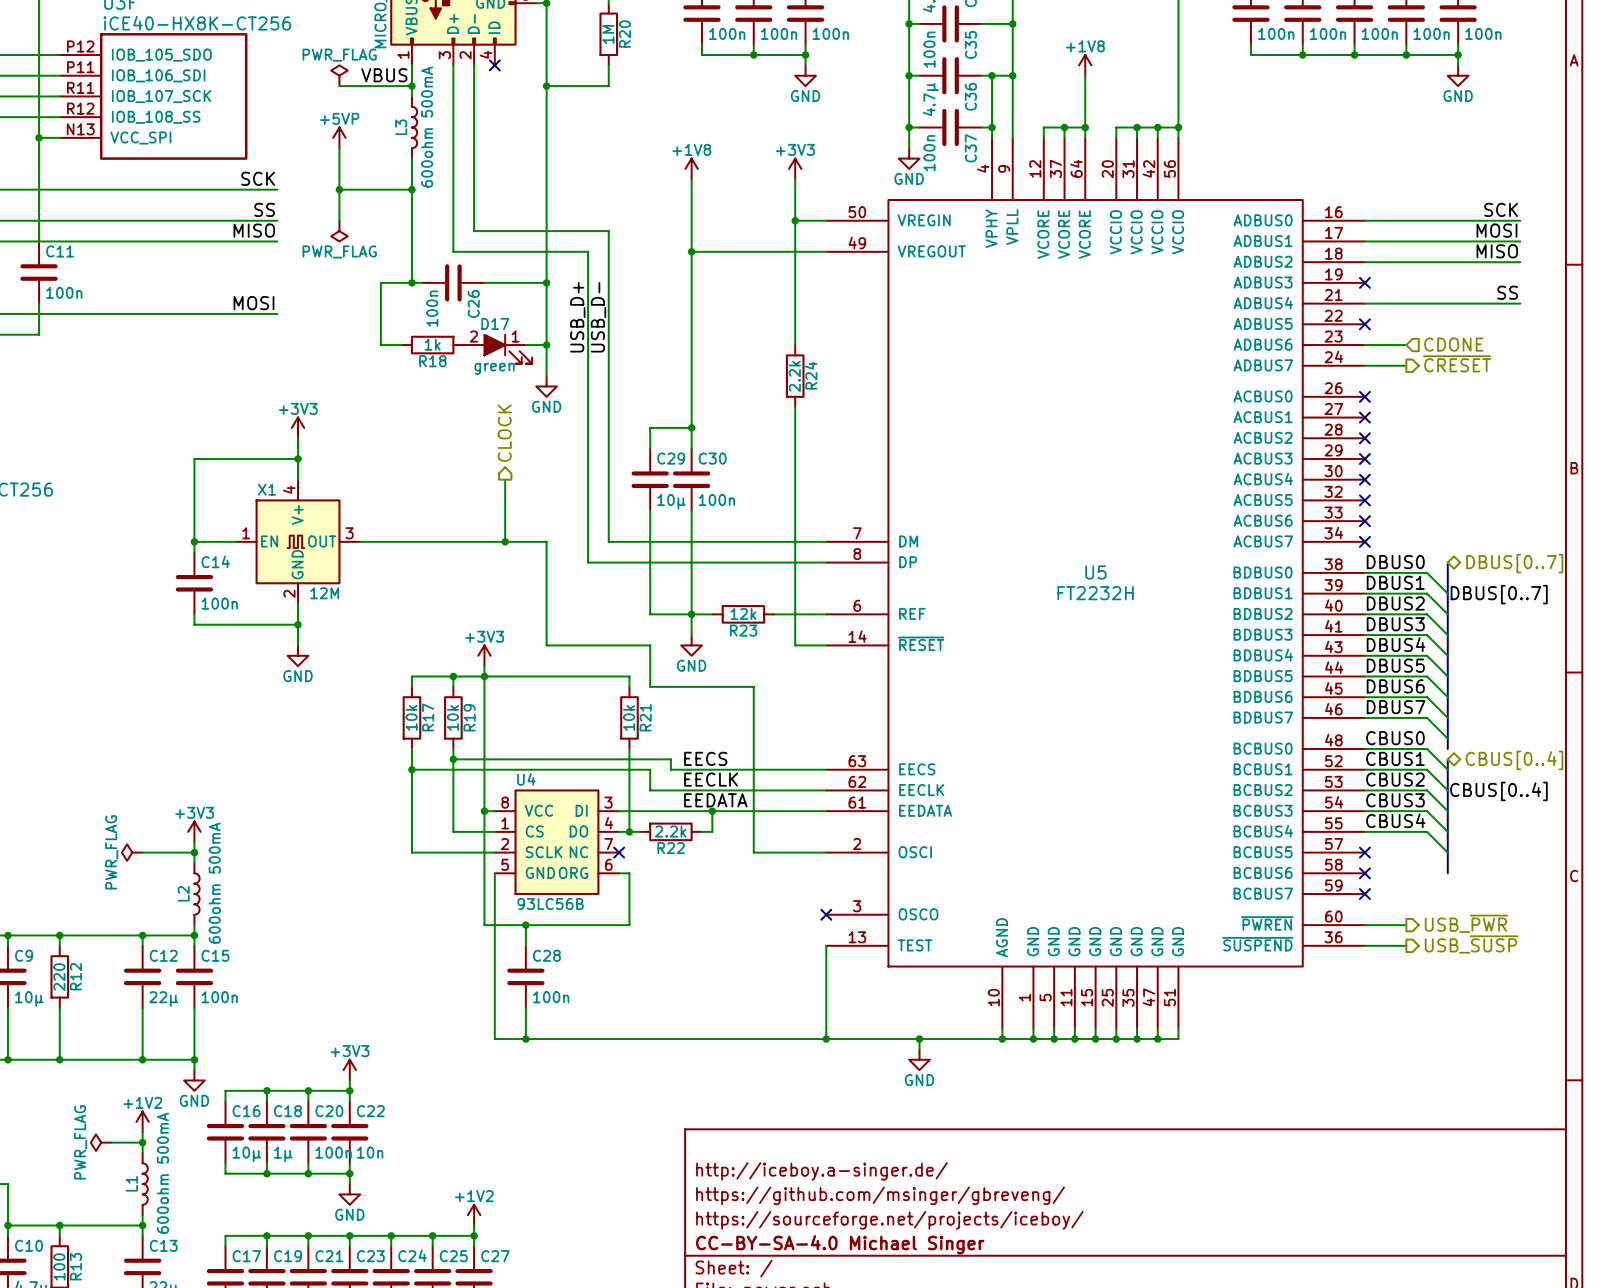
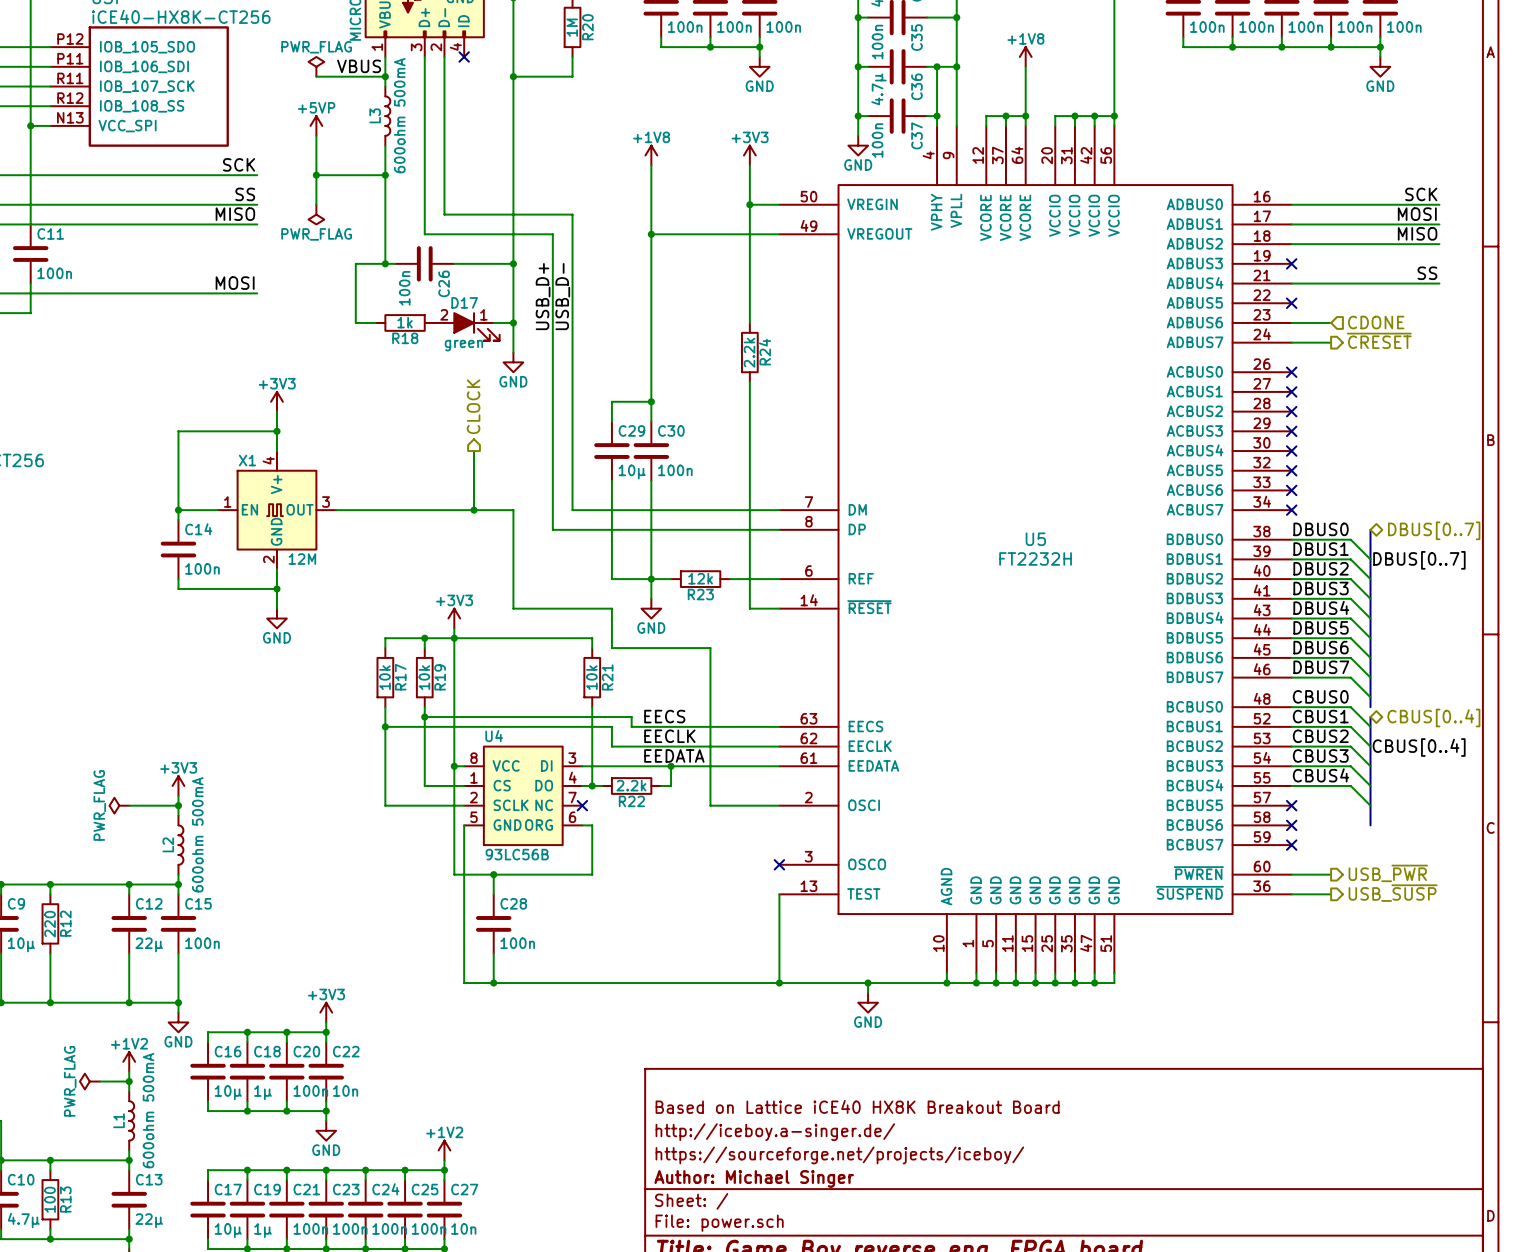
title block: http://iceboy.a-singer.de/ (821, 1171) -> Based on Lattice iCE40 HX8K Breakout Board (857, 1106)
title block: https://github.com/msinger/gbreveng/ (880, 1195) -> http://iceboy.a-singer.de/ (775, 1132)
title block: CC-BY-SA-4.0 Michael Singer (840, 1244) -> Author: Michael Singer (754, 1178)

